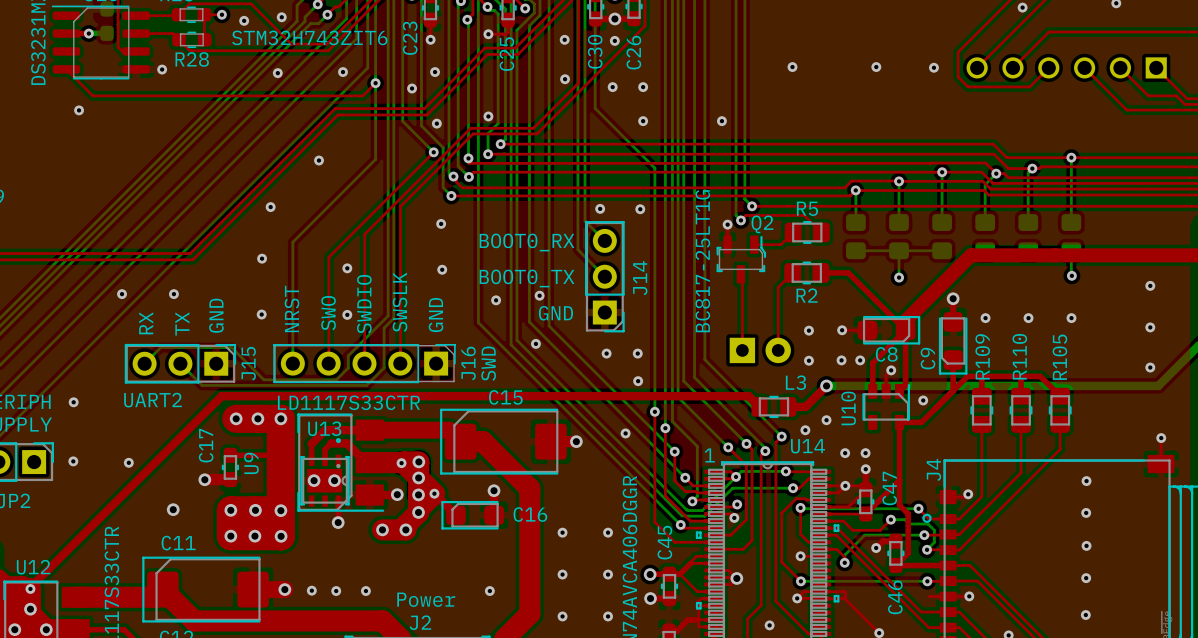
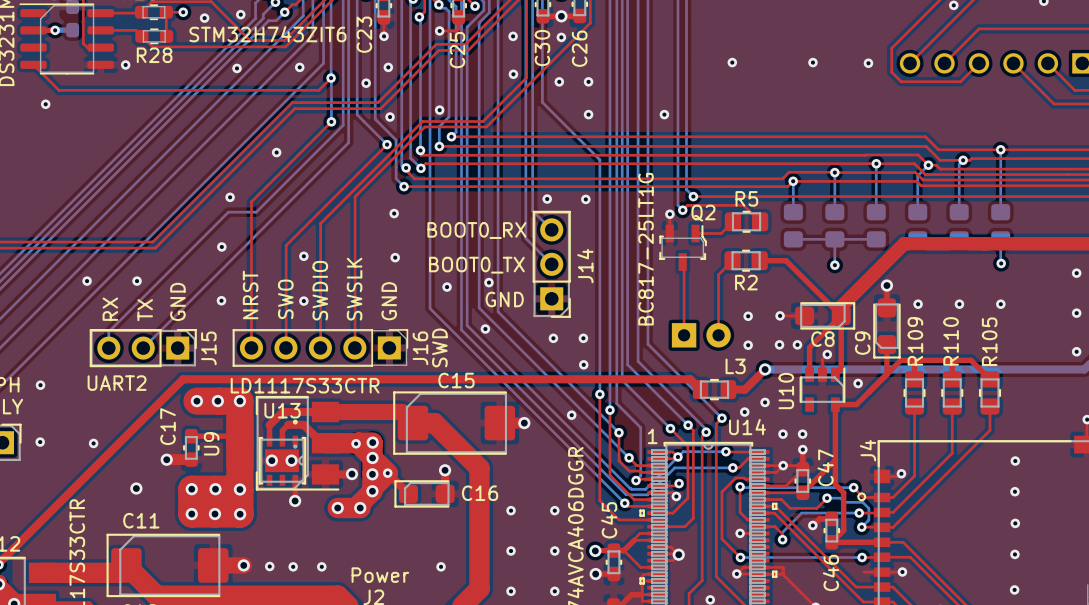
bottom track: (375, 83) (375, 159) (292, 242) (292, 363) -> (331, 78) (331, 121)
top track: none -> (331, 121) (251, 201) (251, 347)
via: none -> (331, 121)
bottom track: (388, 132) (388, 315) (348, 355) (348, 368) (336, 379) (263, 379) (231, 347) (160, 347) (144, 363) -> (343, 125) (256, 212) (228, 212) (108, 331) (108, 348)
bottom track: (393, 150) (393, 318) (384, 327) (384, 368) (366, 385) (202, 385) (180, 363) -> (348, 142) (145, 346)

